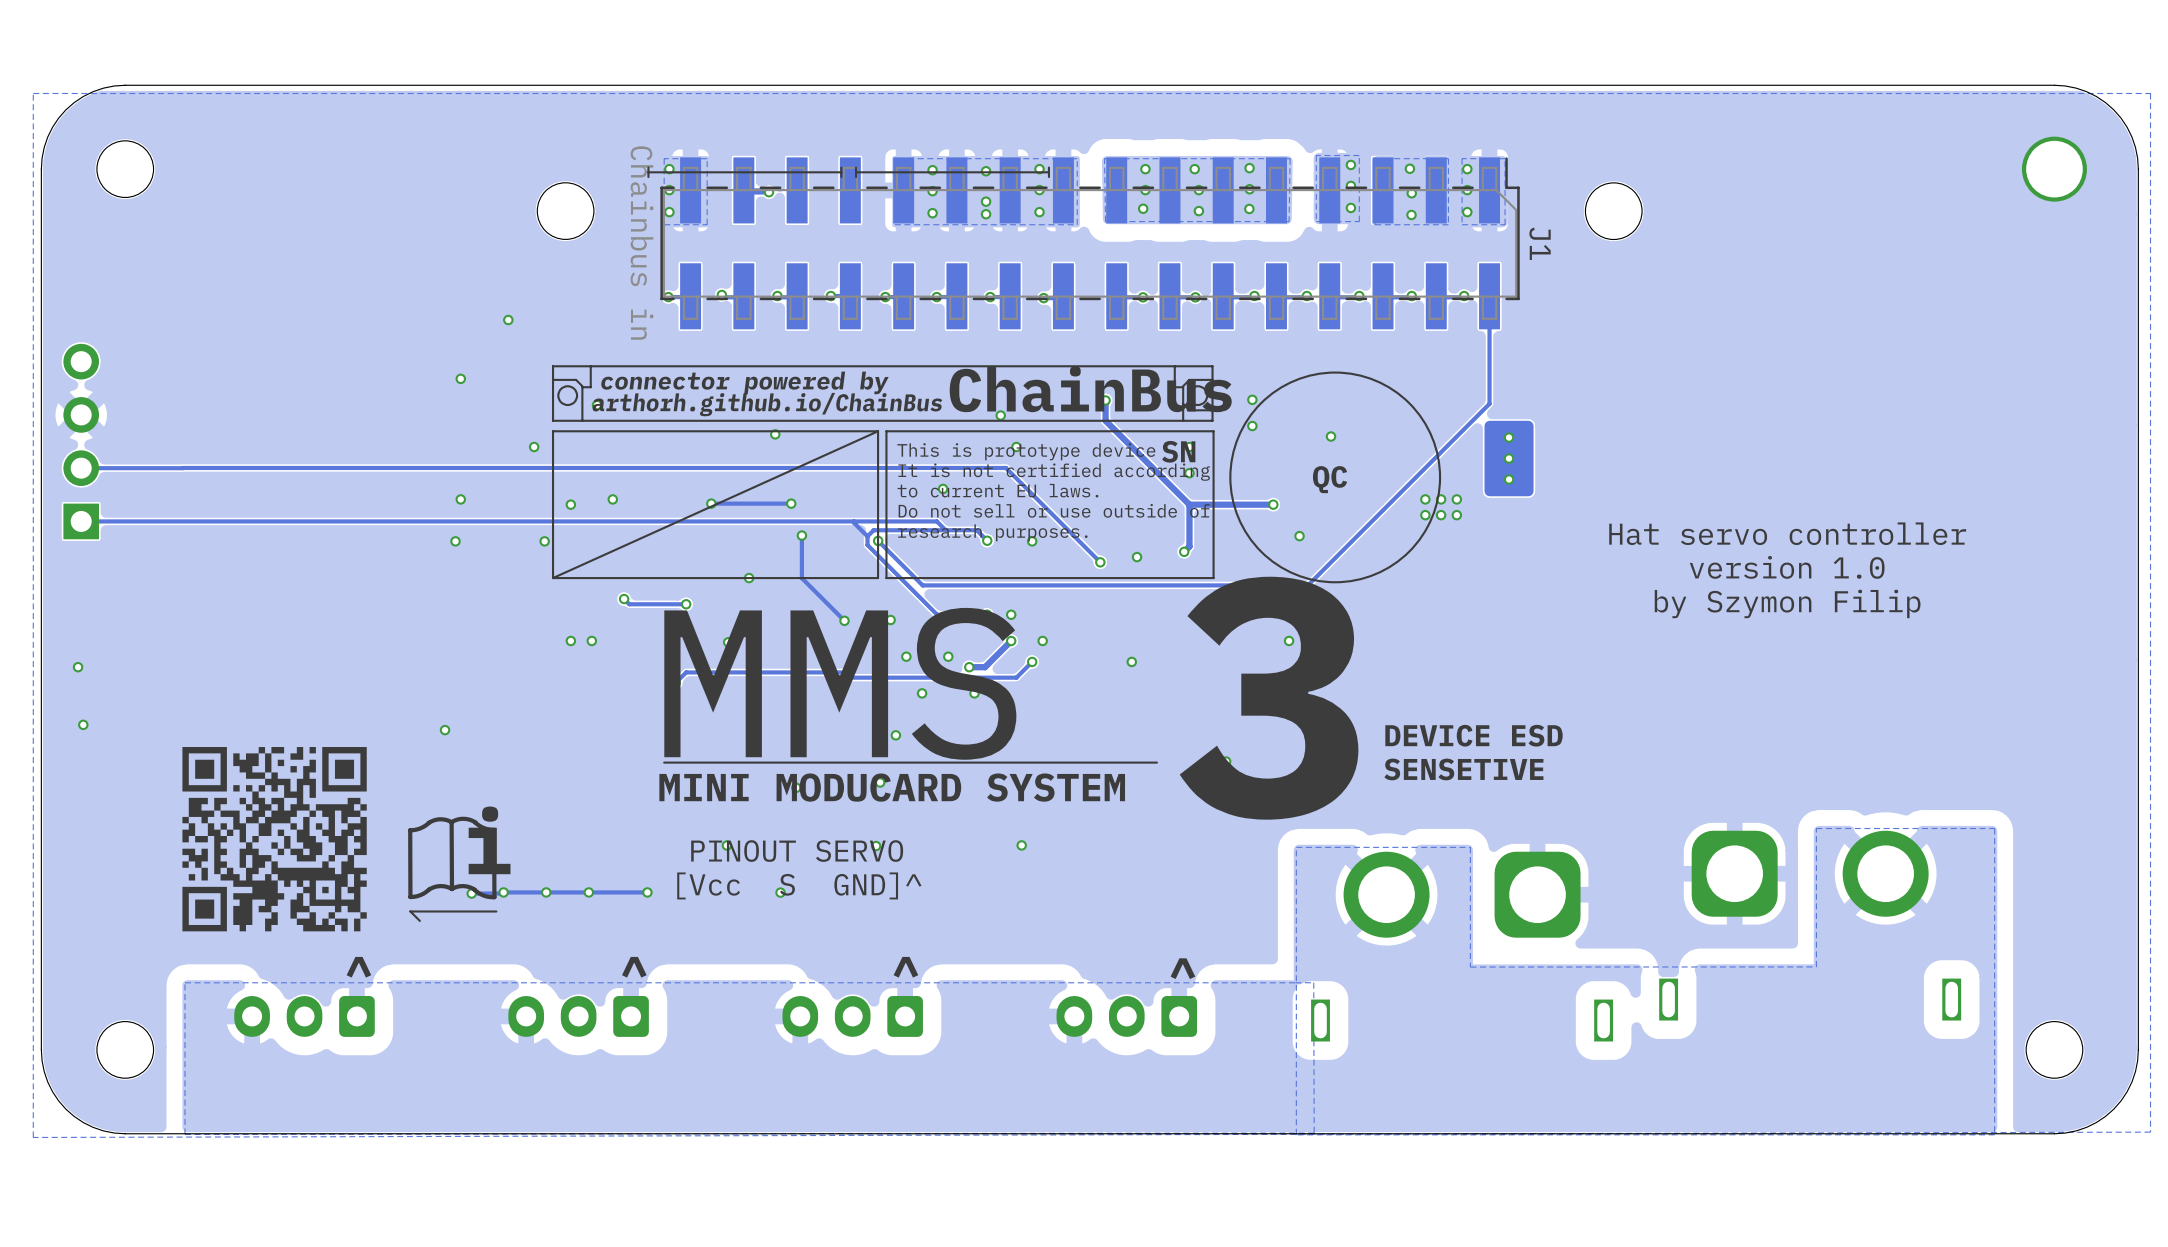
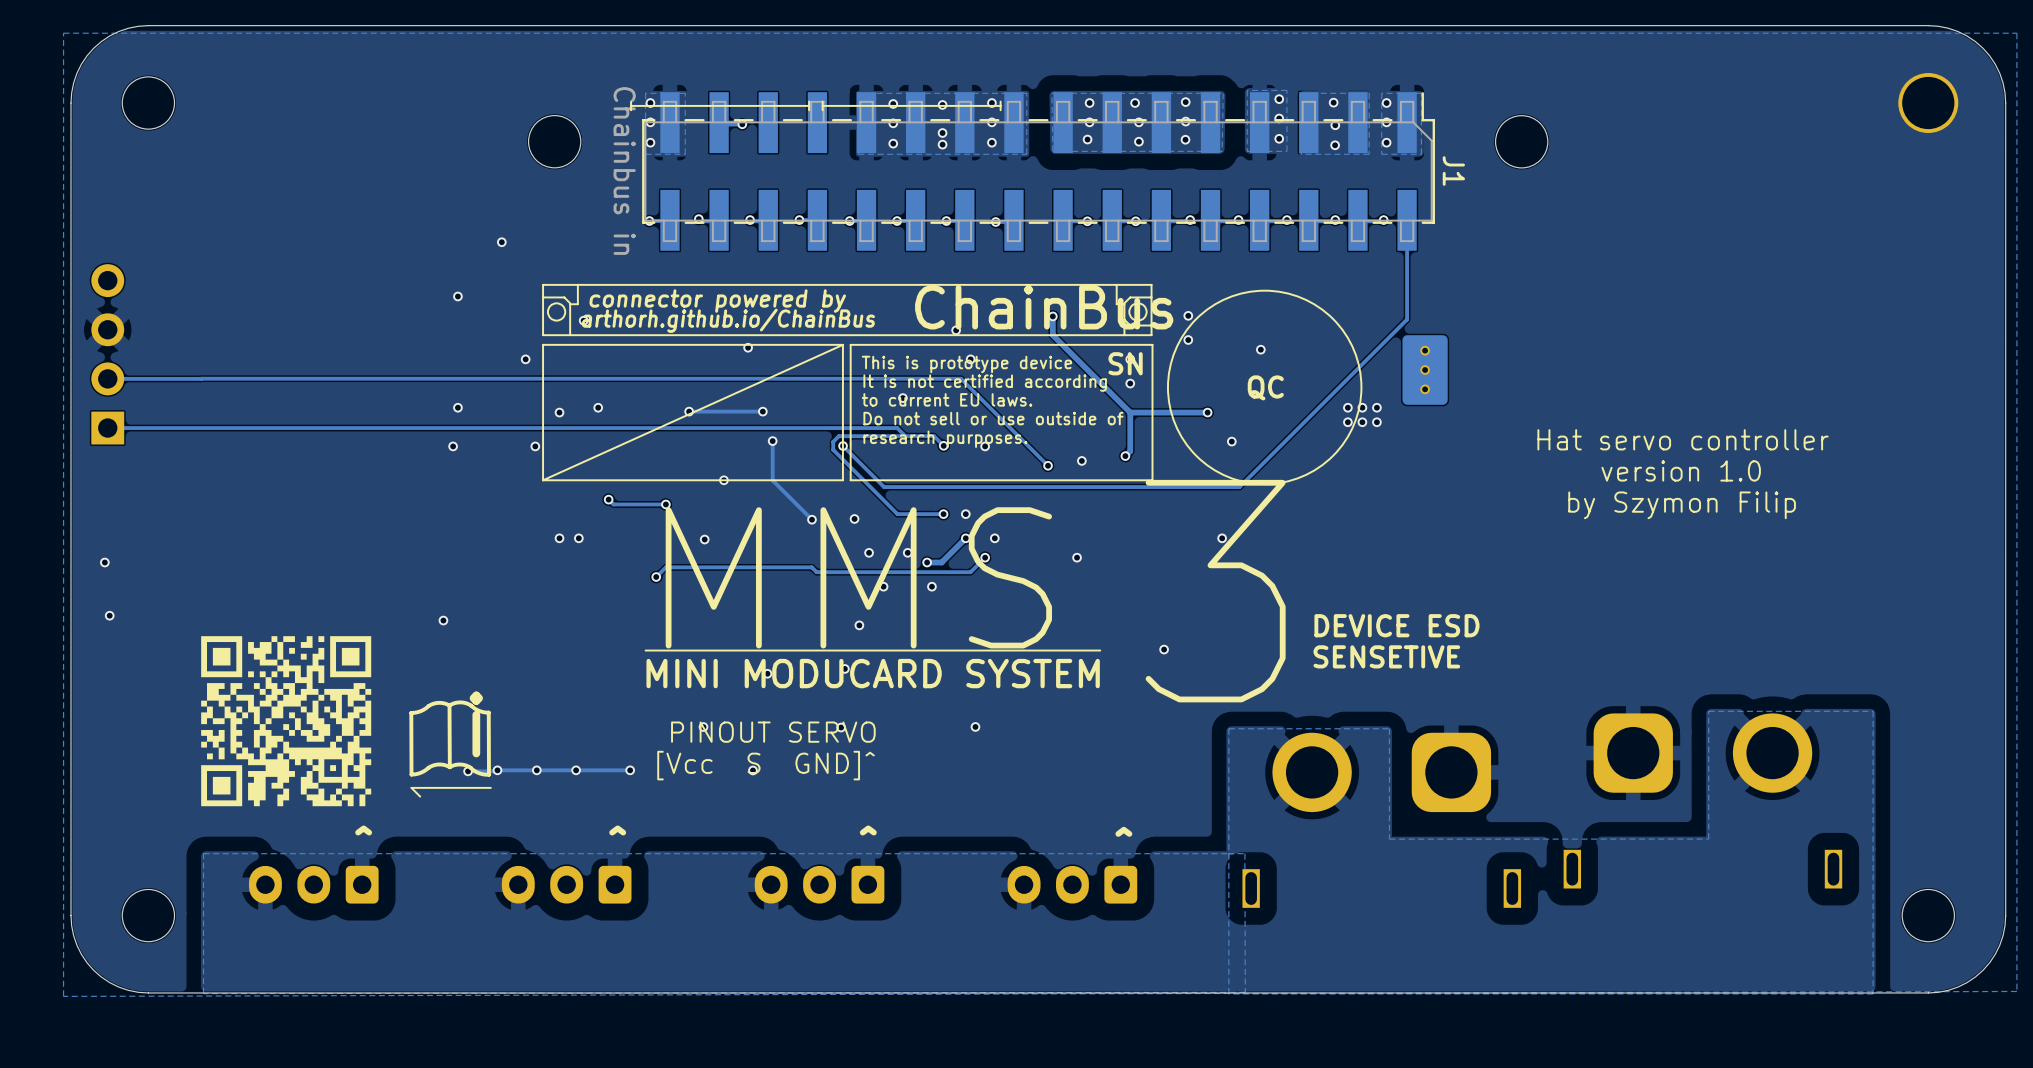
track: (853, 521) (867, 536) -> none

